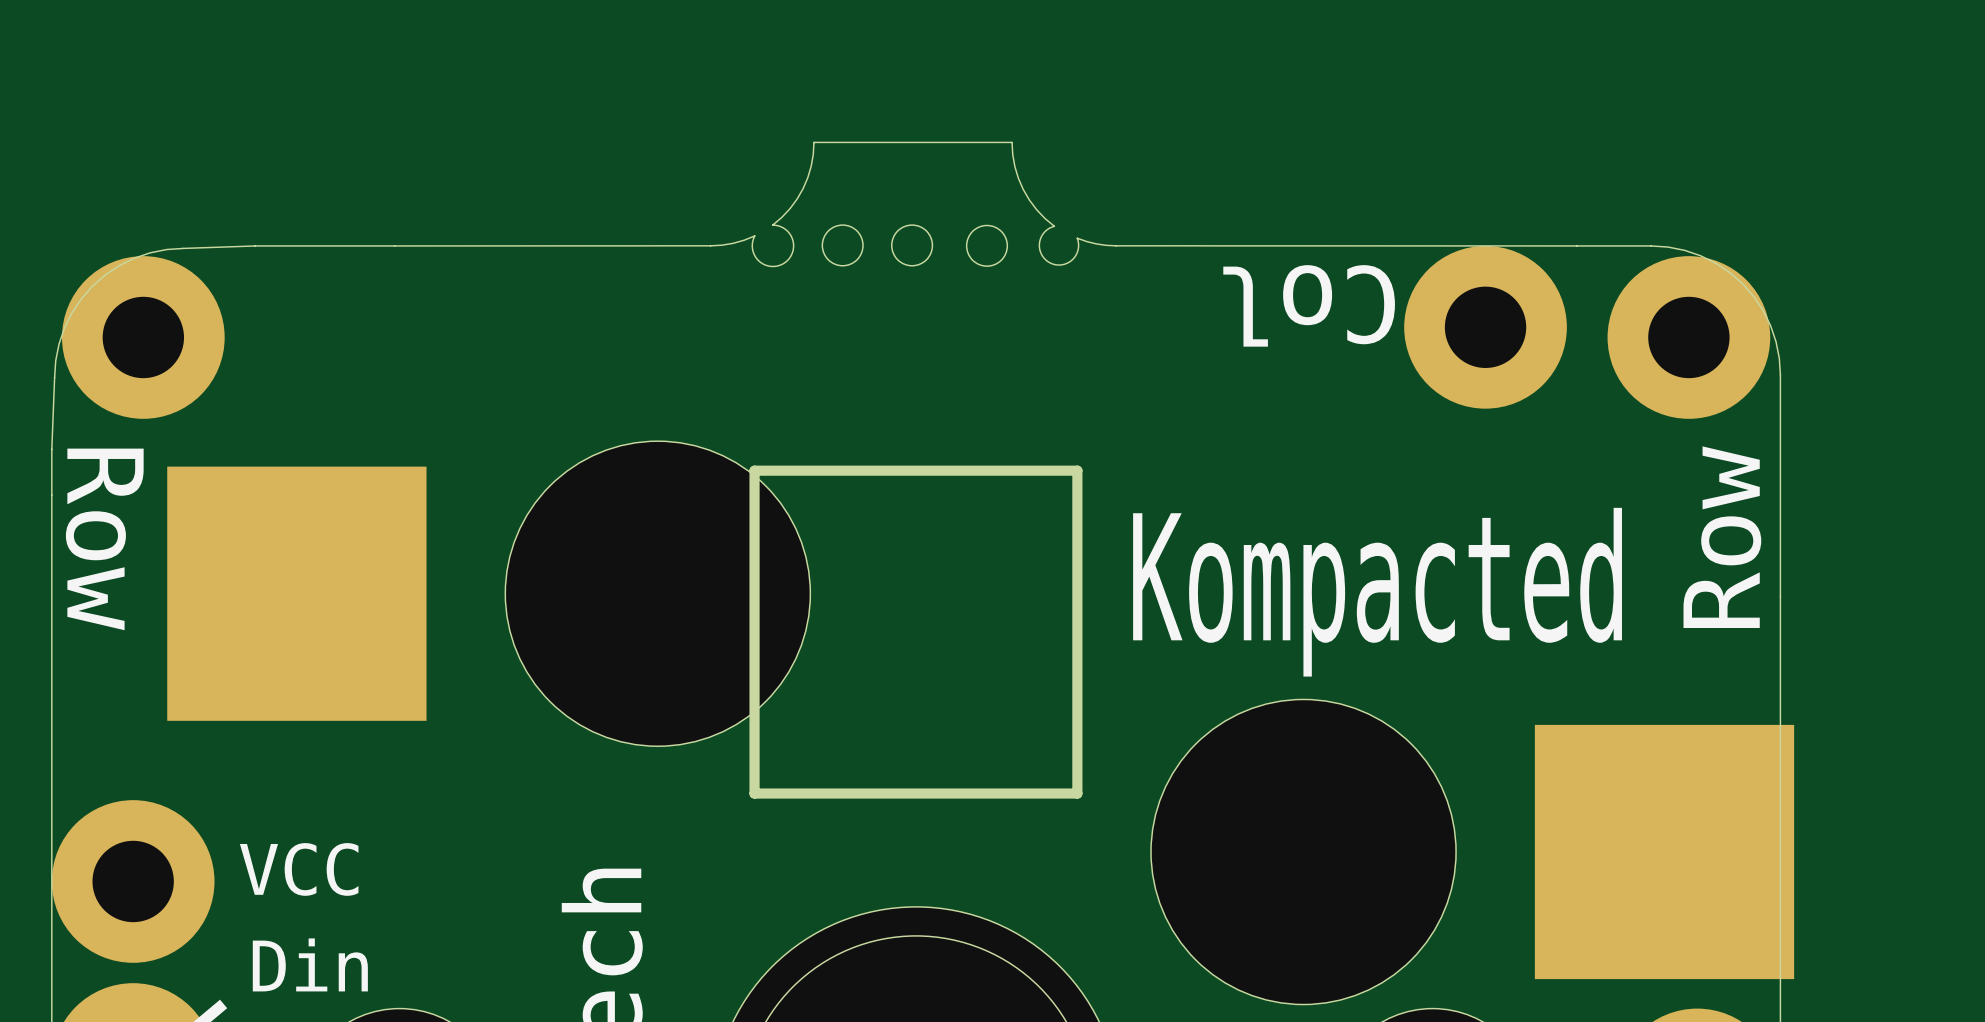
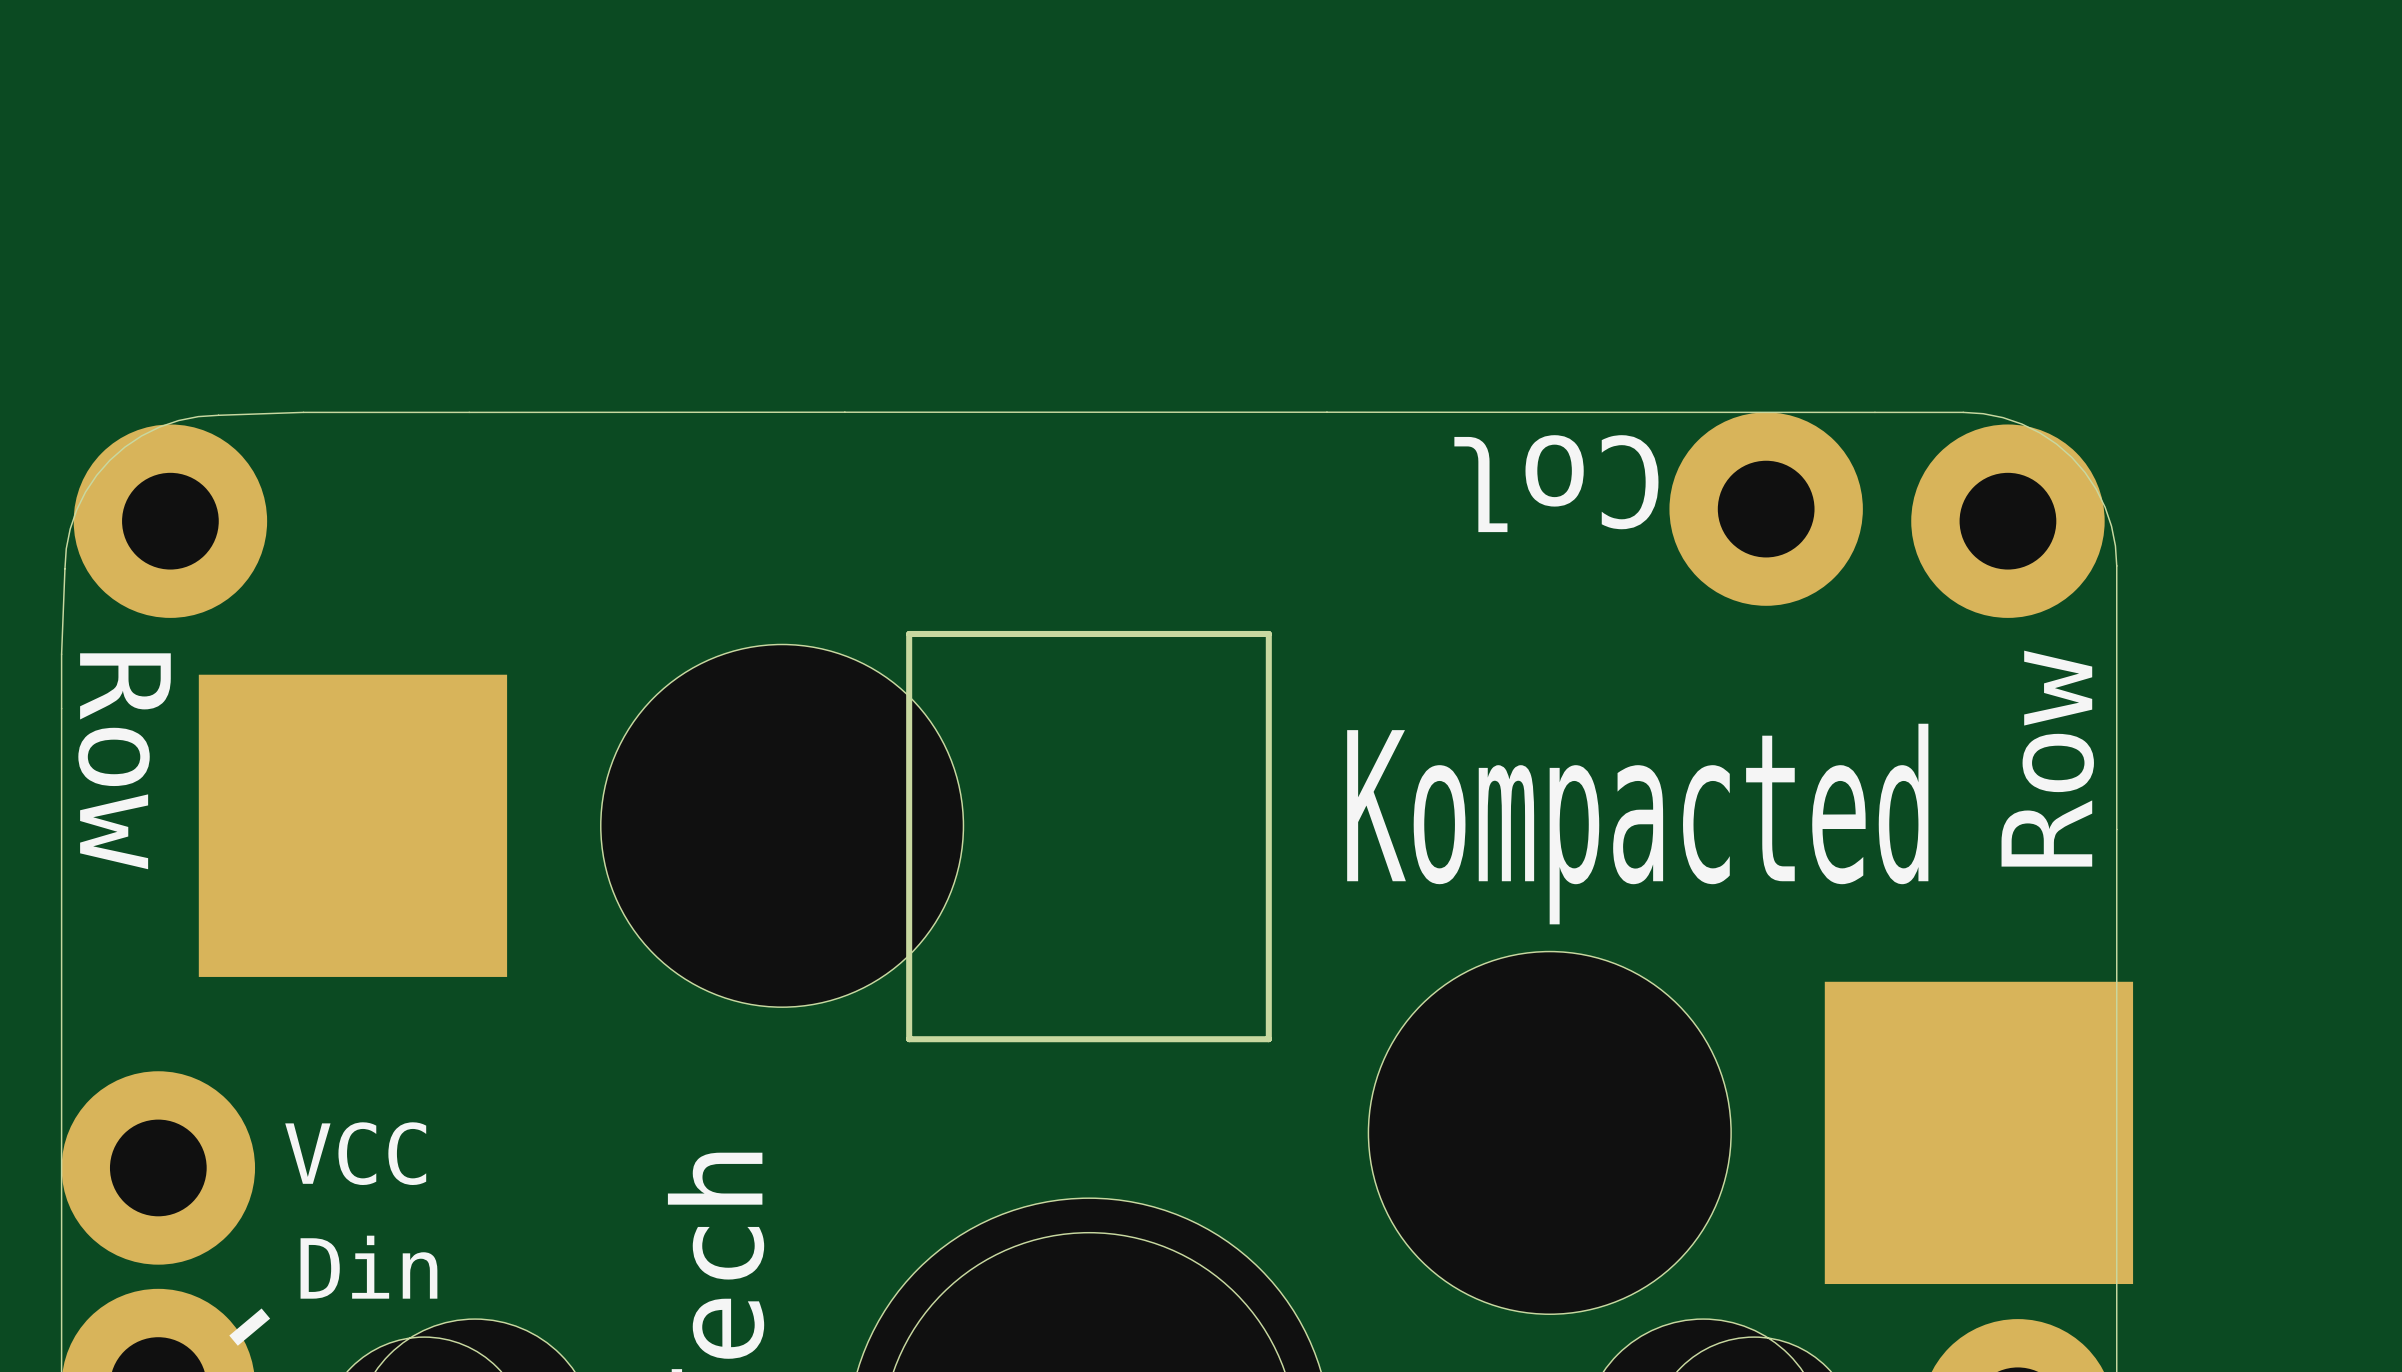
round board edge: [821, 224, 864, 267] -> none
round board edge: [891, 224, 933, 267] -> none
round board edge: [966, 224, 1008, 267] -> none
board edge: (1116, 245) (1096, 243) (1077, 238) (1077, 250) (1069, 262) (1057, 264) (1045, 259) (1040, 251) (1039, 241) (1043, 232) (1054, 226) (1036, 209) (1023, 189) (1014, 166) (1012, 142) (813, 142) (811, 166) (803, 188) (790, 208) (772, 225) (785, 229) (791, 237) (793, 248) (787, 260) (781, 264) (773, 266) (760, 262) (753, 251) (752, 243) (754, 235) (733, 243) (710, 245) -> (1326, 412) (844, 412)
board edge: (1077, 470) (1077, 793) (754, 793) (754, 470) (1077, 470) -> (1268, 633) (1268, 1039) (909, 1039) (909, 633) (1268, 633)

